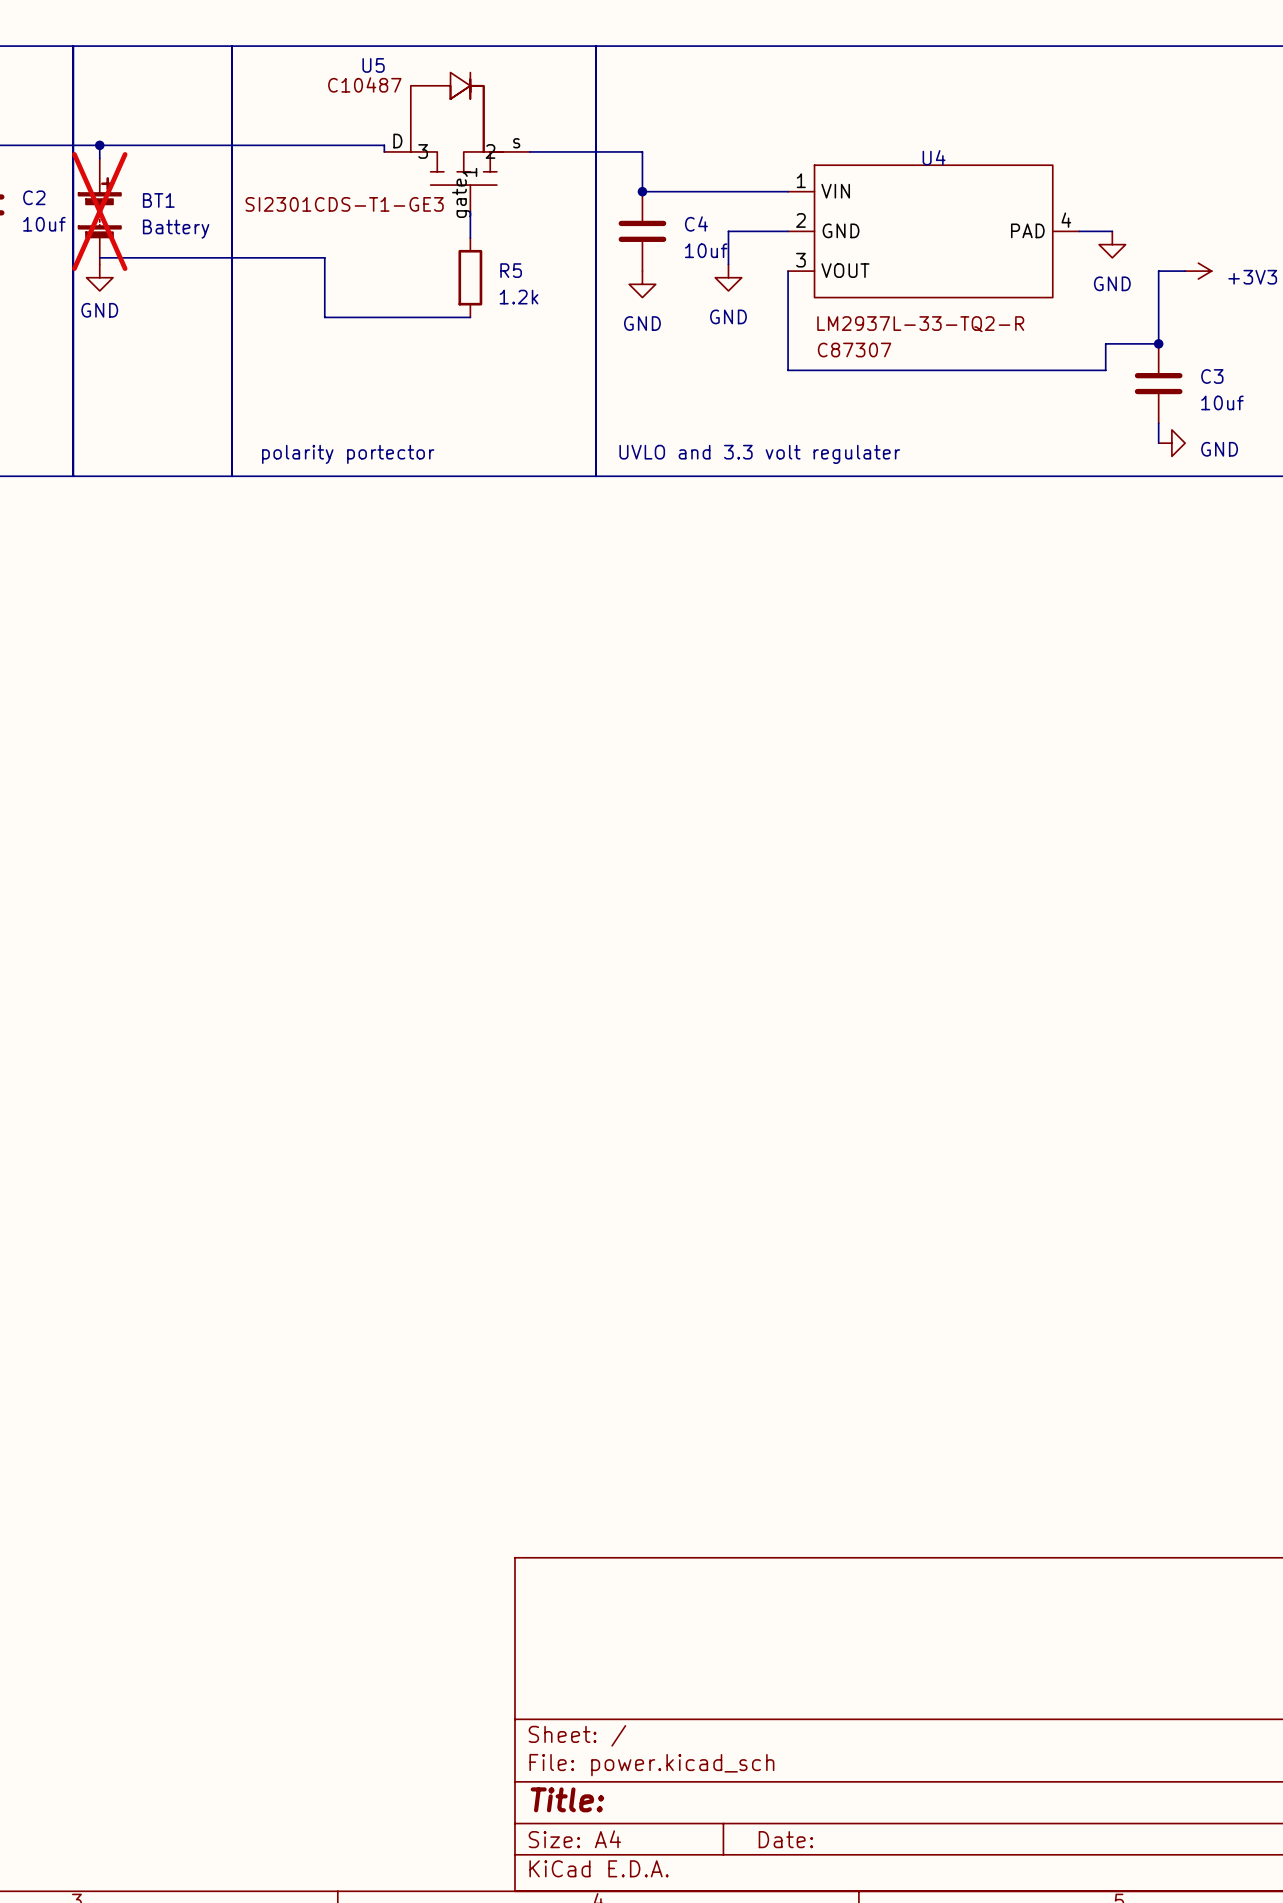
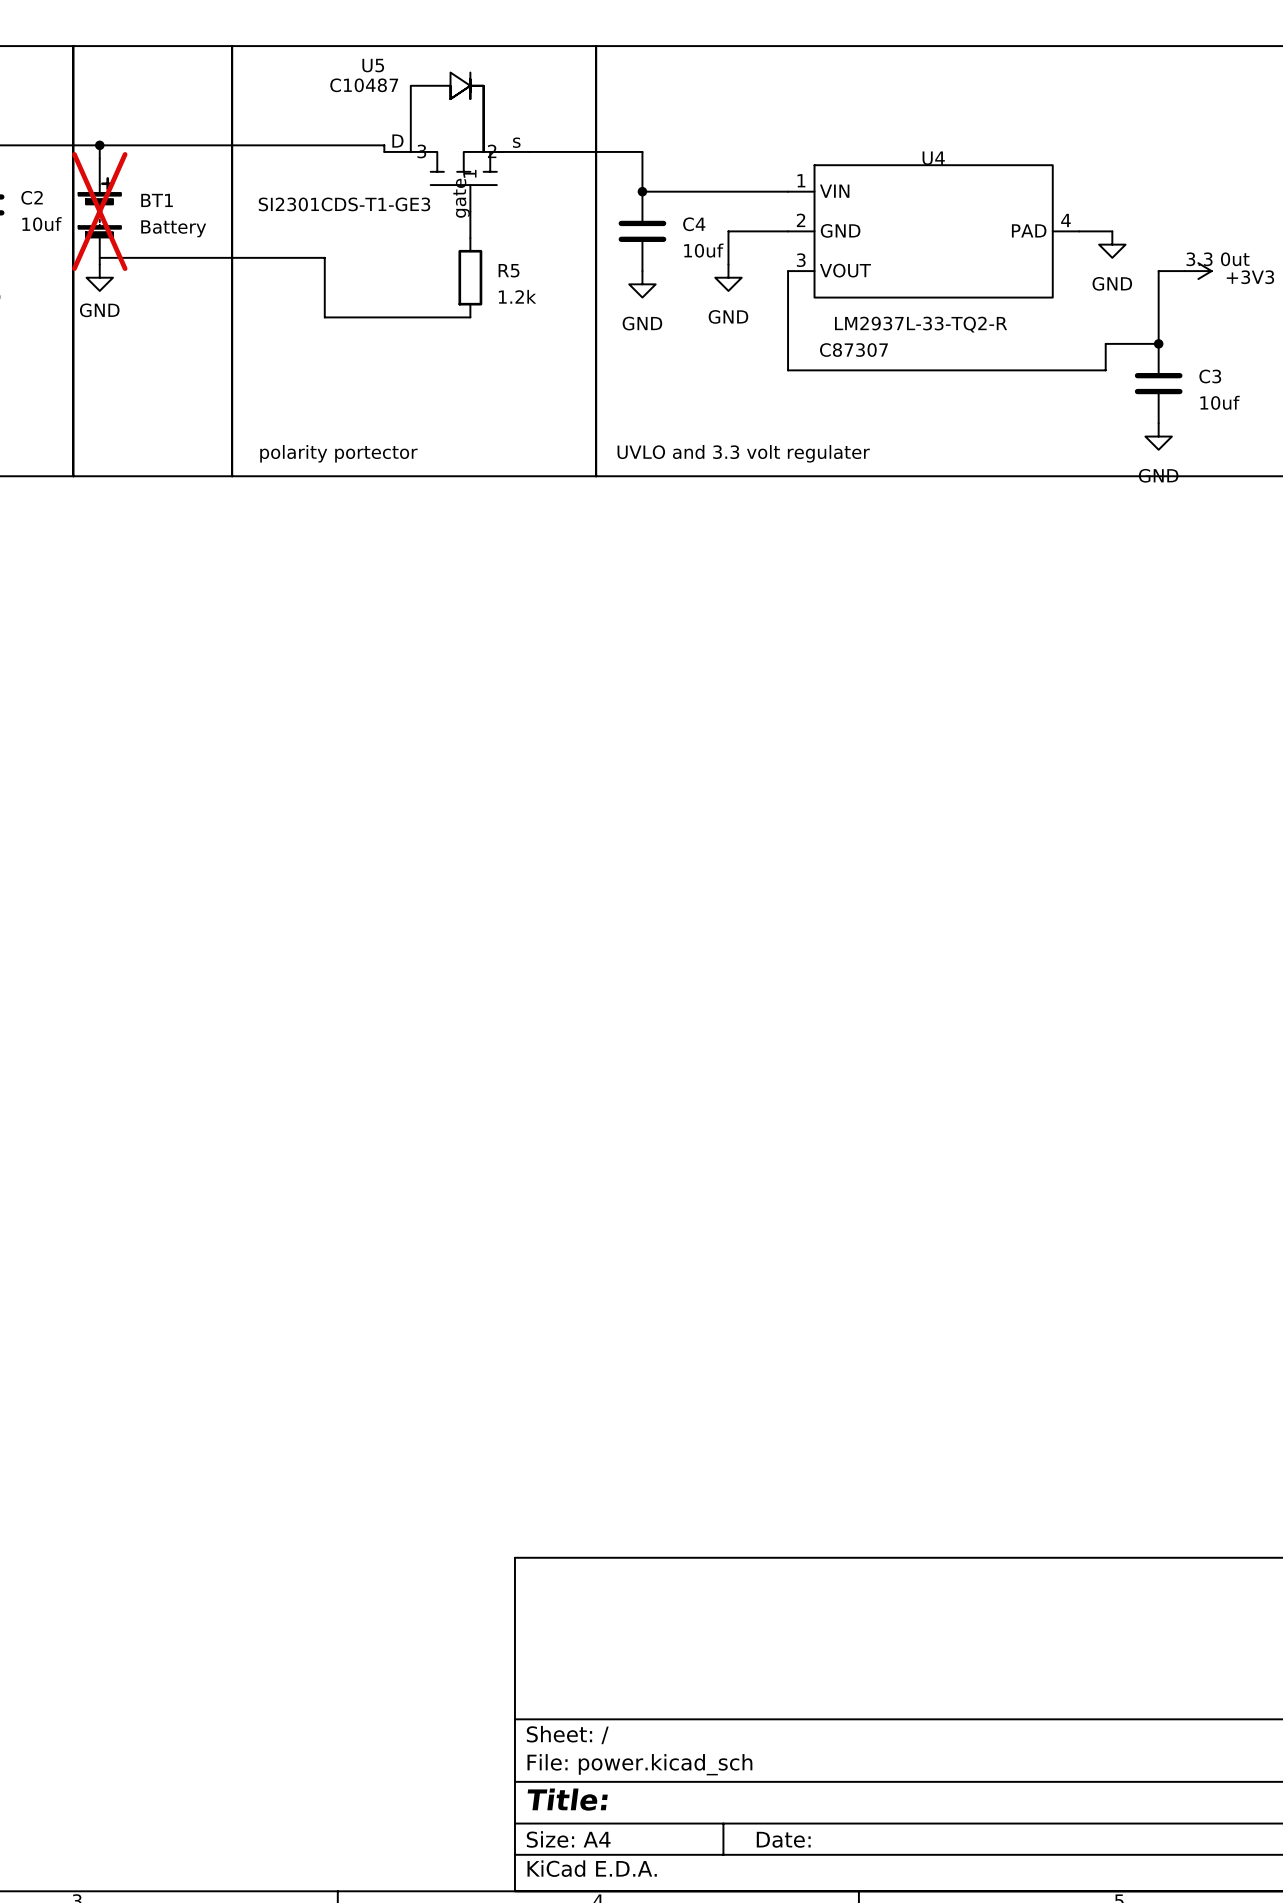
label: none -> 3.3 0ut (1218, 259)
power symbol rotation: 0° (1171, 443) -> 90° clockwise (1158, 436)

